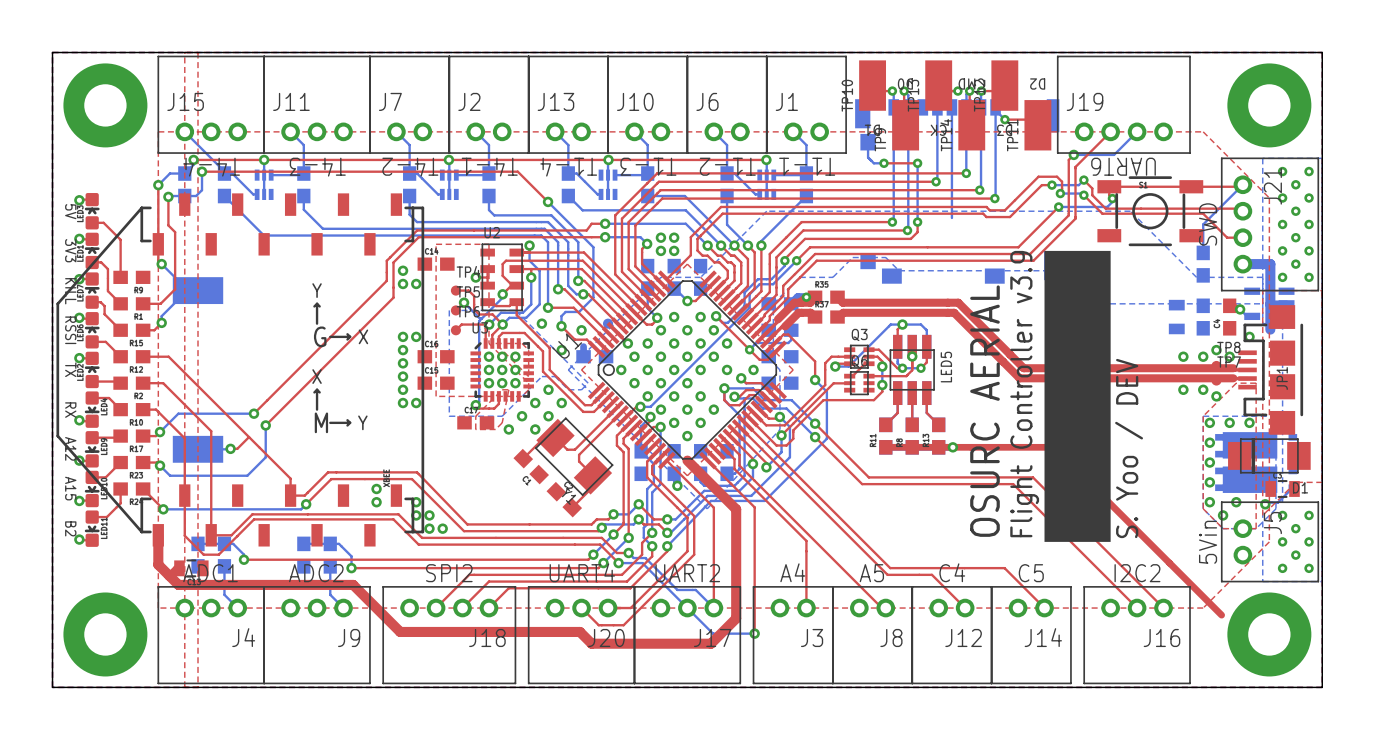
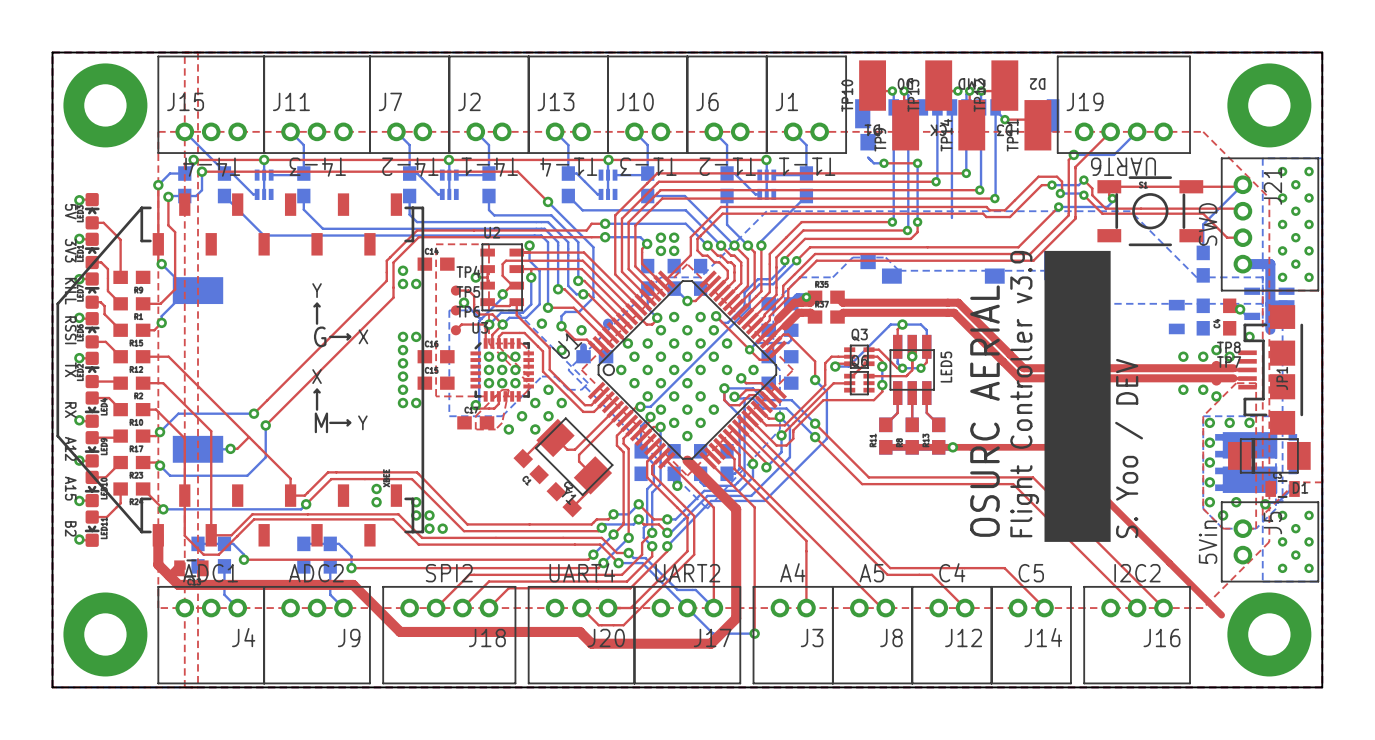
bottom track: (868, 142) (868, 157) -> none

